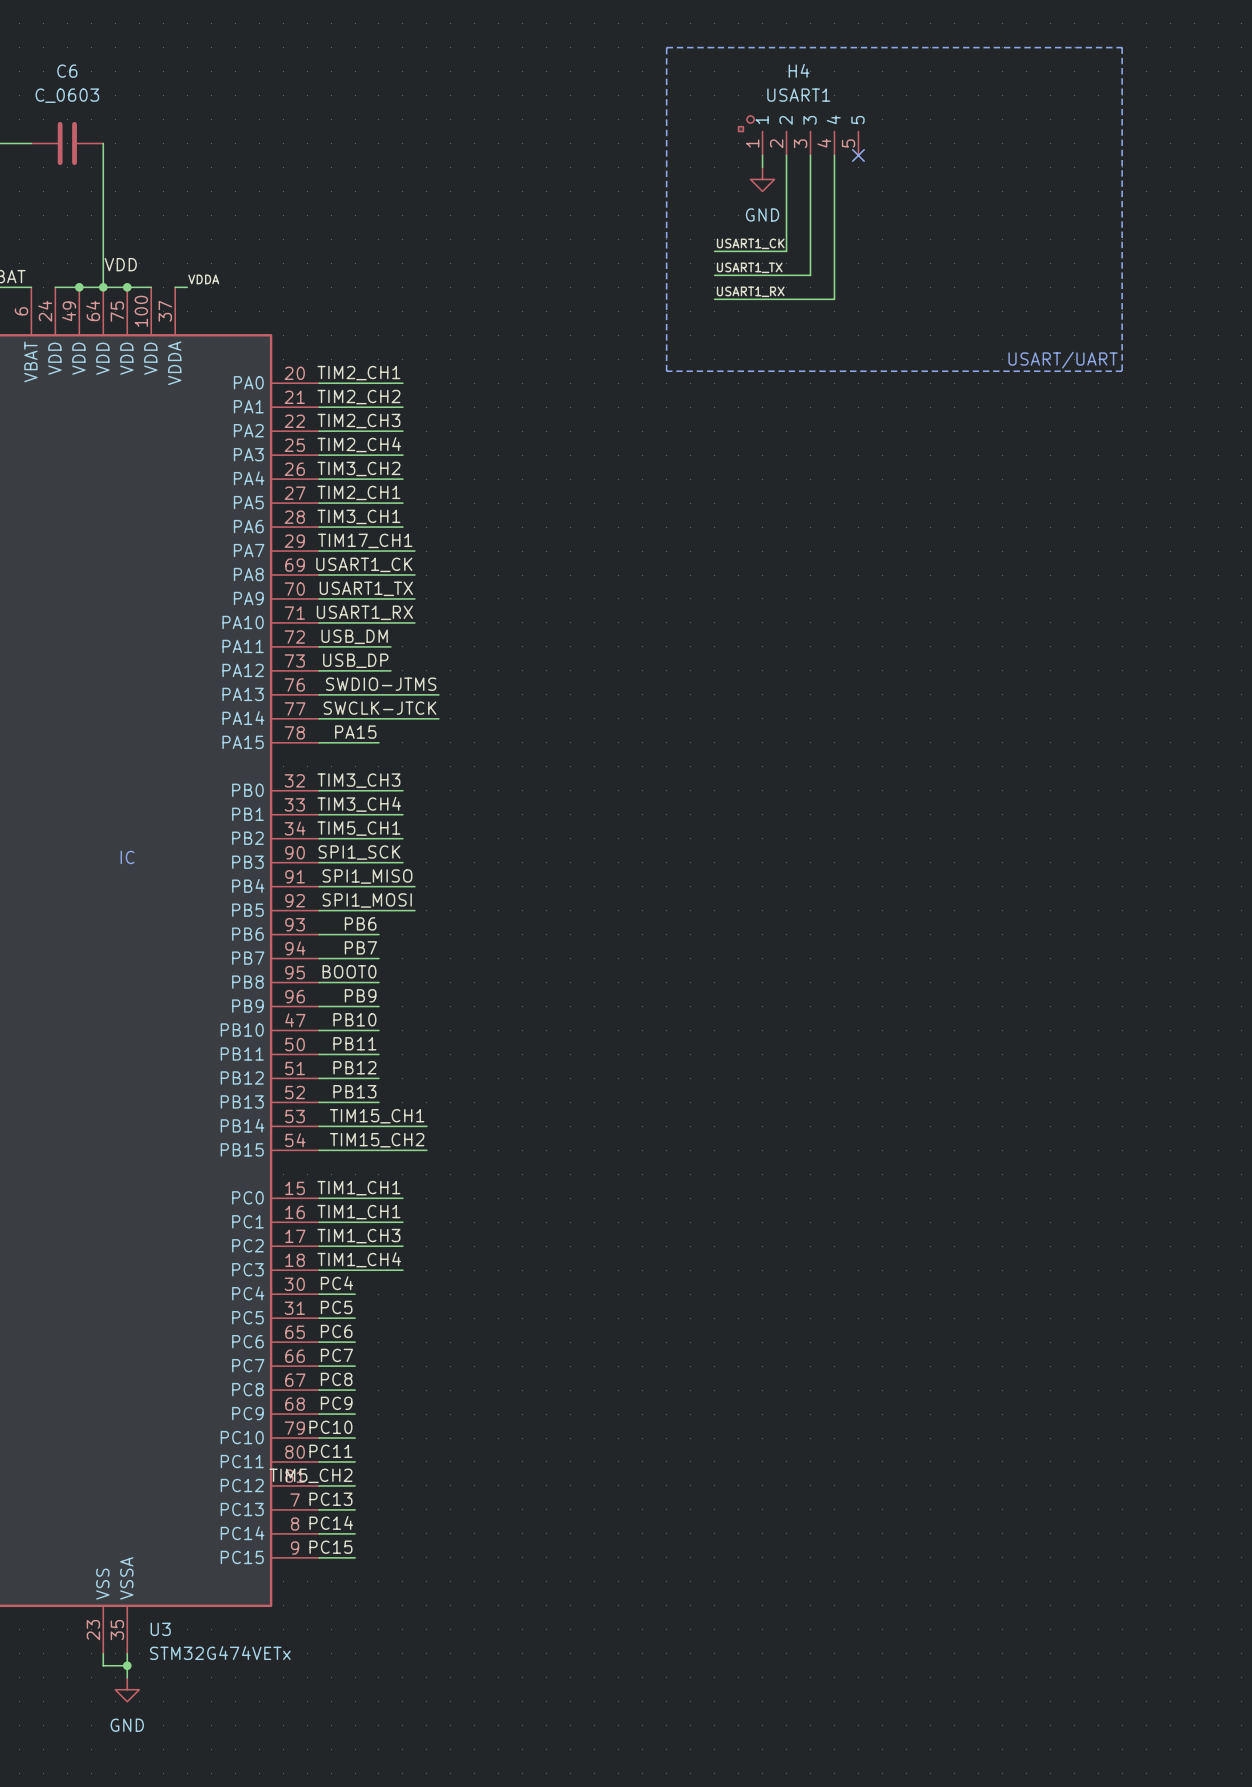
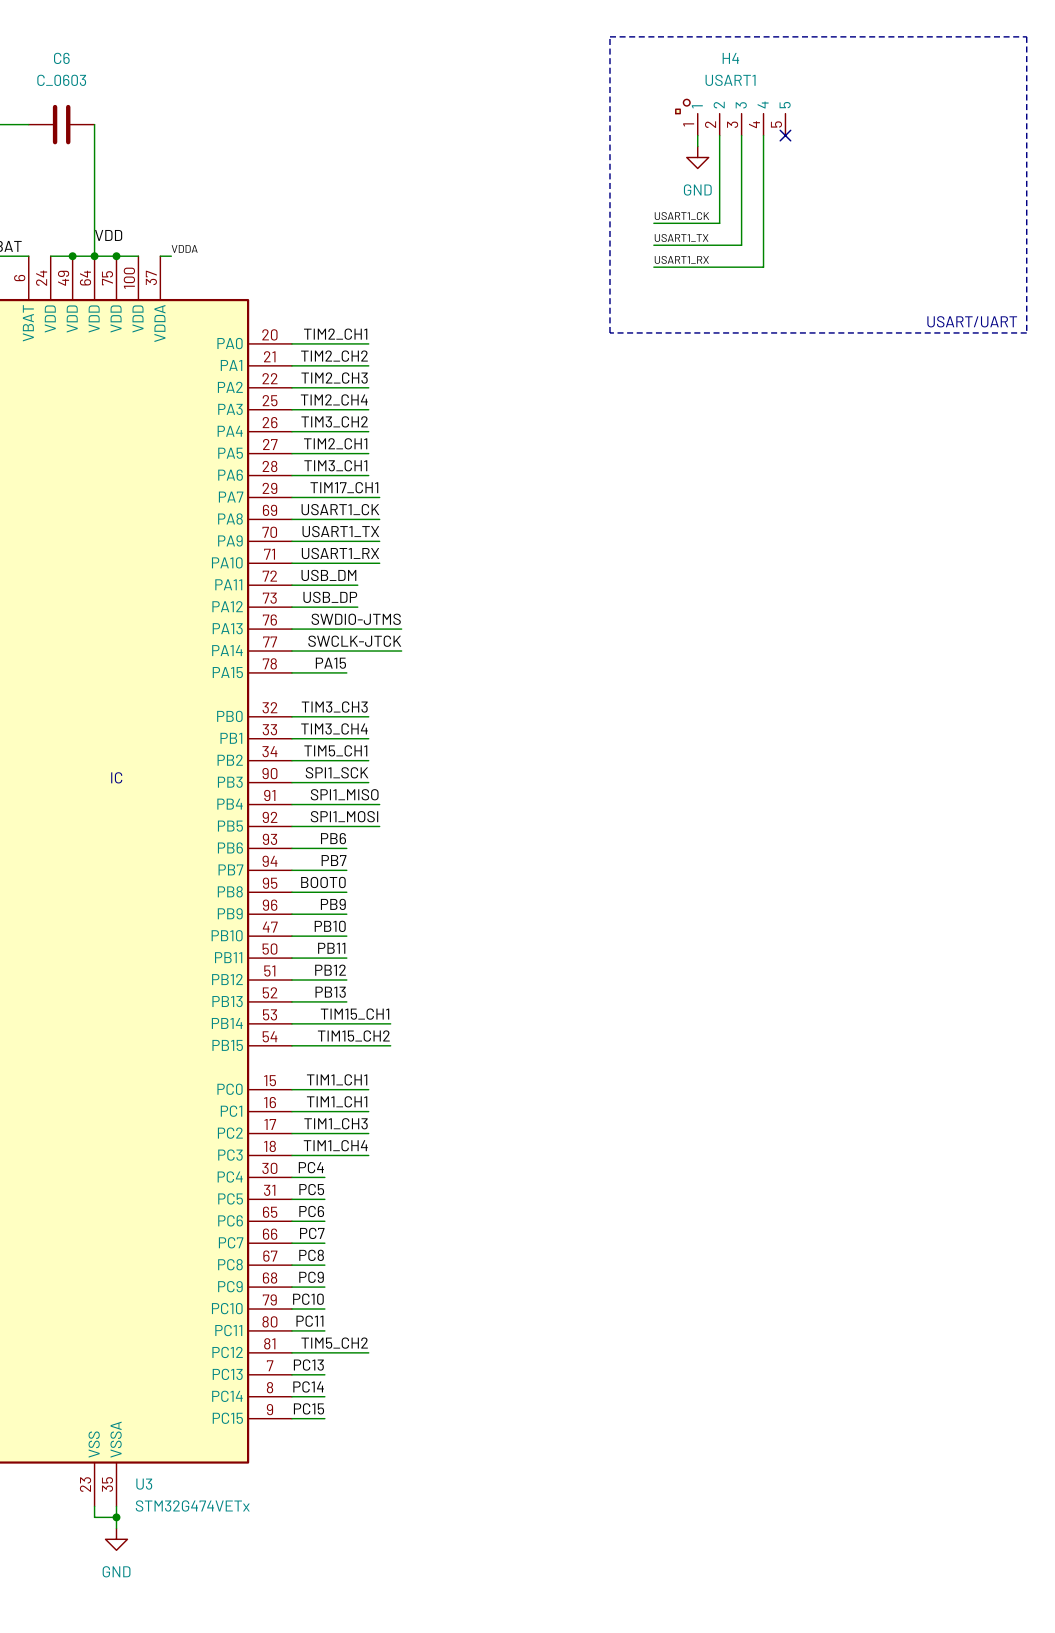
label position: TIM5_CH2 (310, 1475) -> TIM5_CH2 (334, 1343)
wire: none -> (324, 1352) (368, 1352)

